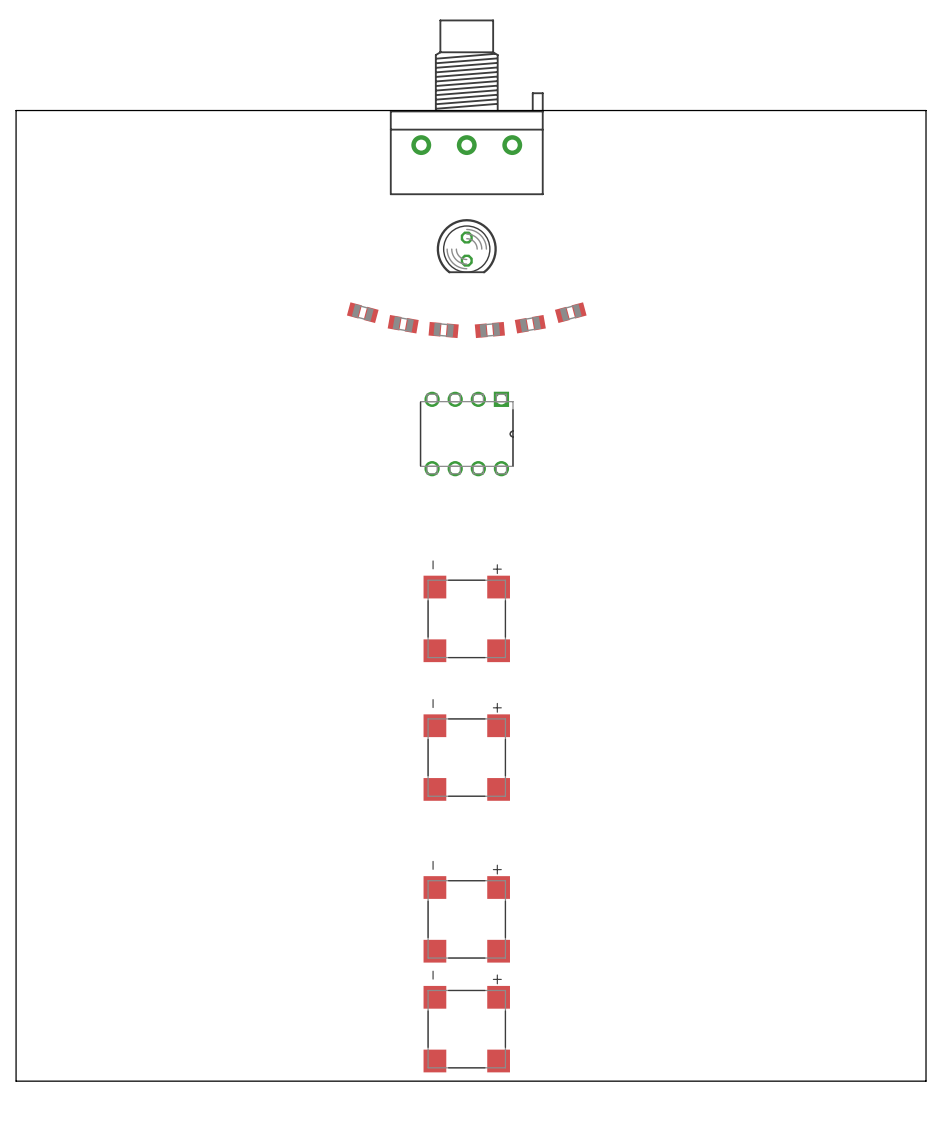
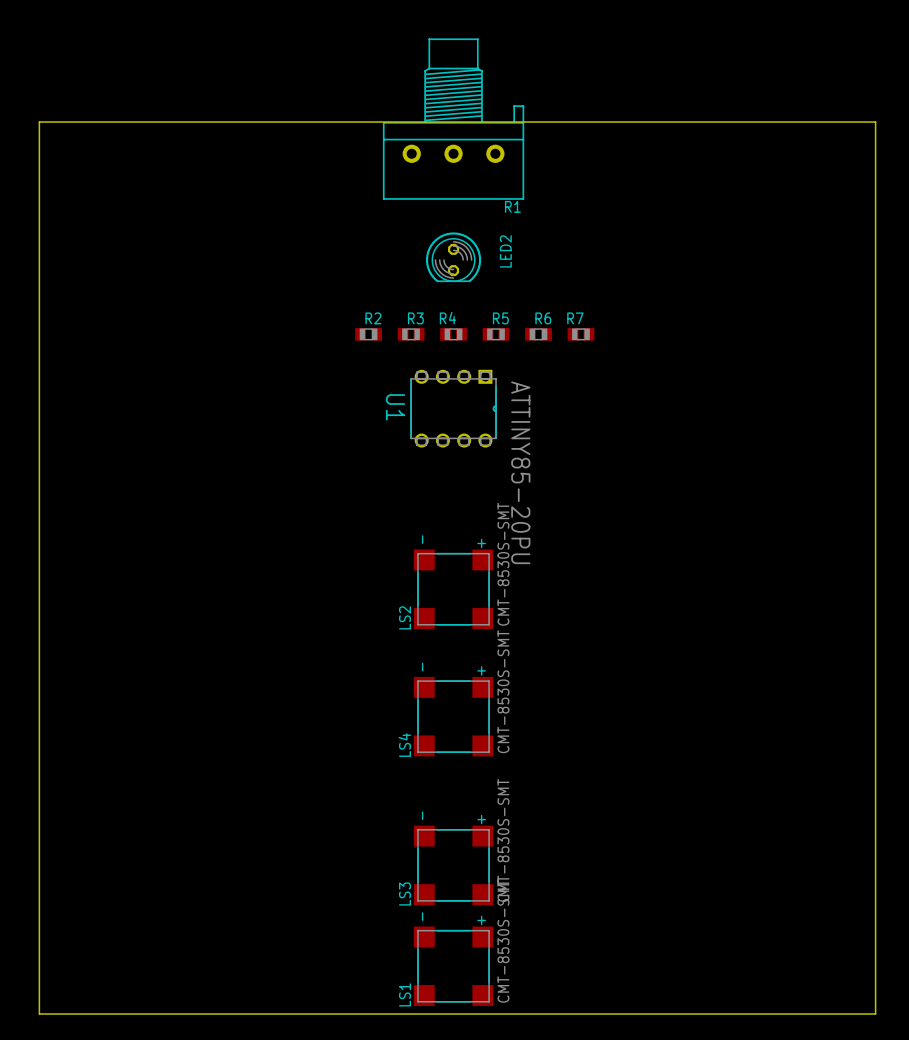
R1 name: none -> R1 (512, 206)
part: (466, 246) -> none
LED2: none -> (453, 257)
part: (362, 312) -> none
part: (570, 312) -> none
part: (403, 324) -> none
part: (530, 324) -> none
part: (443, 330) -> none
part: (489, 330) -> none
R2: none -> (368, 334)
R3: none -> (411, 334)
R4: none -> (453, 334)
R5: none -> (496, 334)
R6: none -> (538, 334)
R7: none -> (580, 334)
U1: none -> ATTINY85-20PU (453, 408)
part: (466, 434) -> none
LS2 value: none -> CMT-8530S-SMT (503, 564)
LS2 name: none -> LS2 (404, 617)
LS4 value: none -> CMT-8530S-SMT (503, 691)
LS4 name: none -> LS4 (404, 745)
LS3 value: none -> CMT-8530S-SMT (503, 840)
LS3 name: none -> LS3 (404, 893)
LS1 value: none -> CMT-8530S-SMT (503, 941)
LS1 name: none -> LS1 (404, 994)

